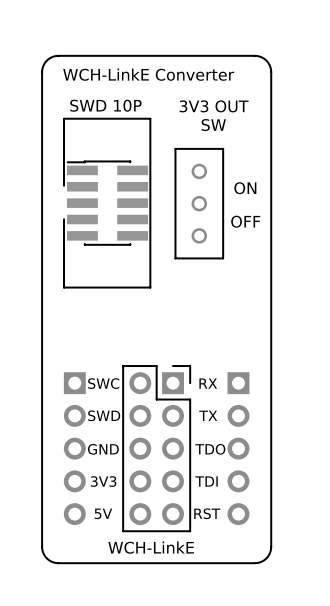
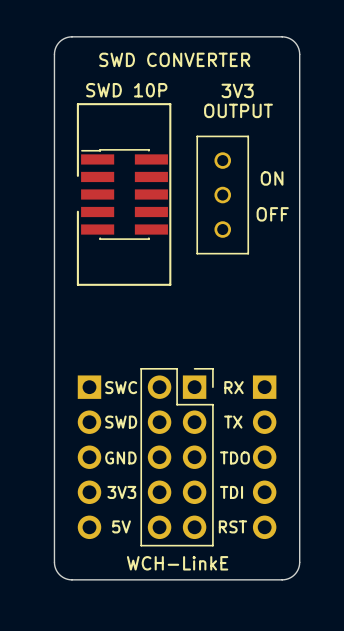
text: WCH-LinkE Converter (148, 74) -> none
text: none -> SWD CONVERTER (174, 59)
text: 3V3 OUT (214, 106) -> 3V3 (237, 90)
text: SW (213, 125) -> OUTPUT (238, 110)

